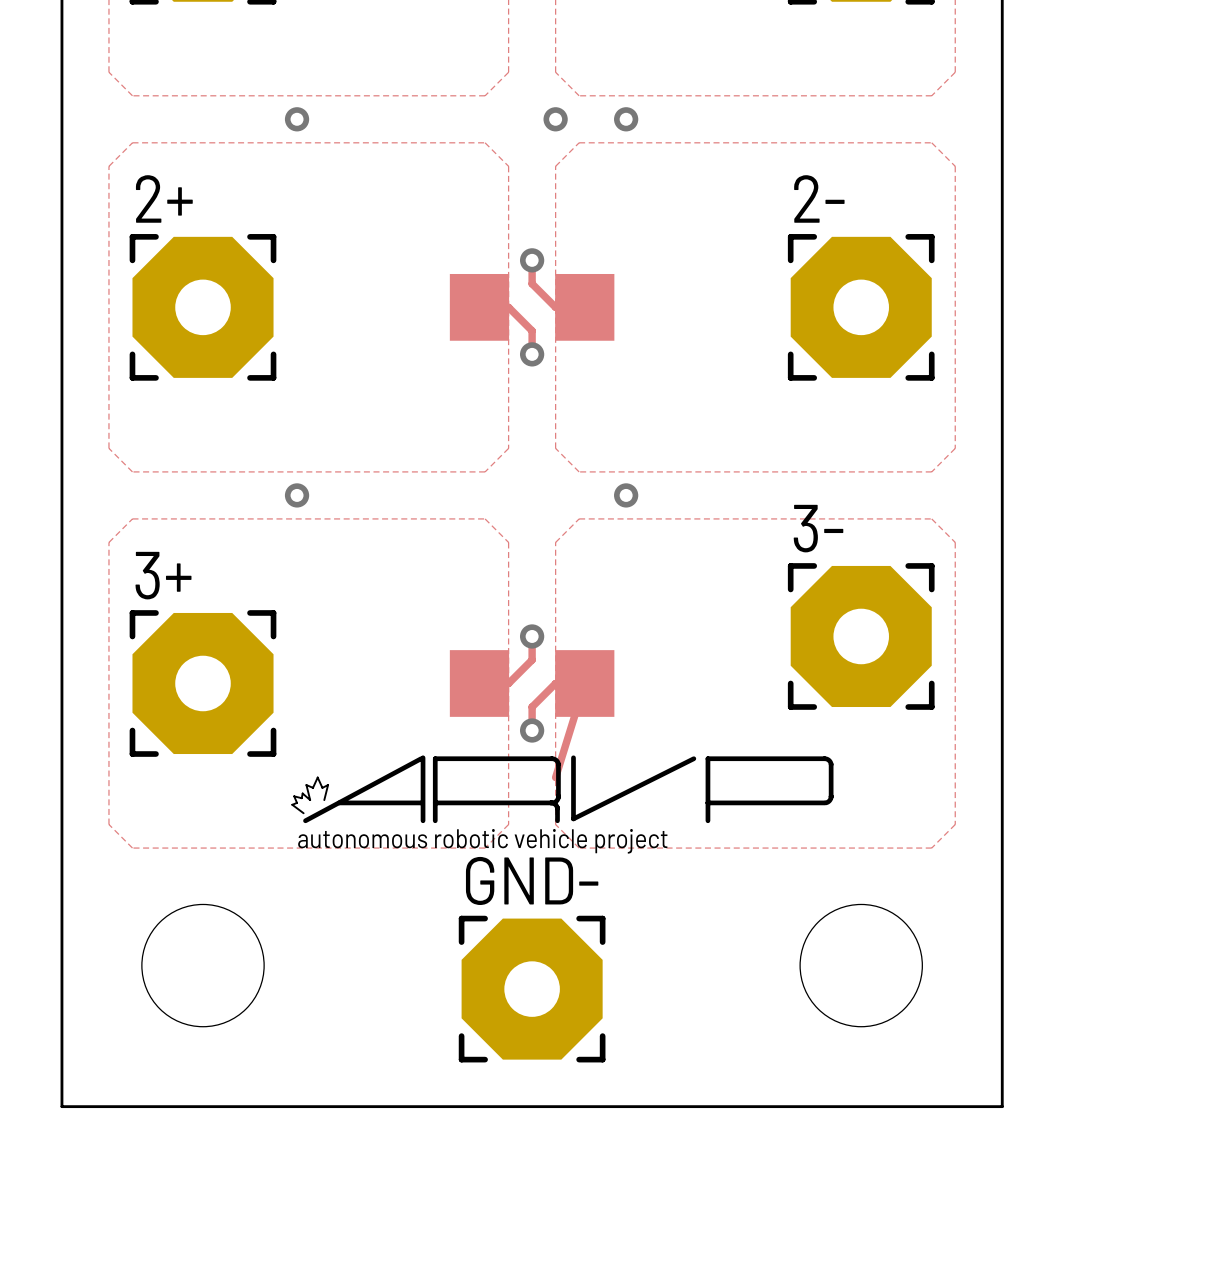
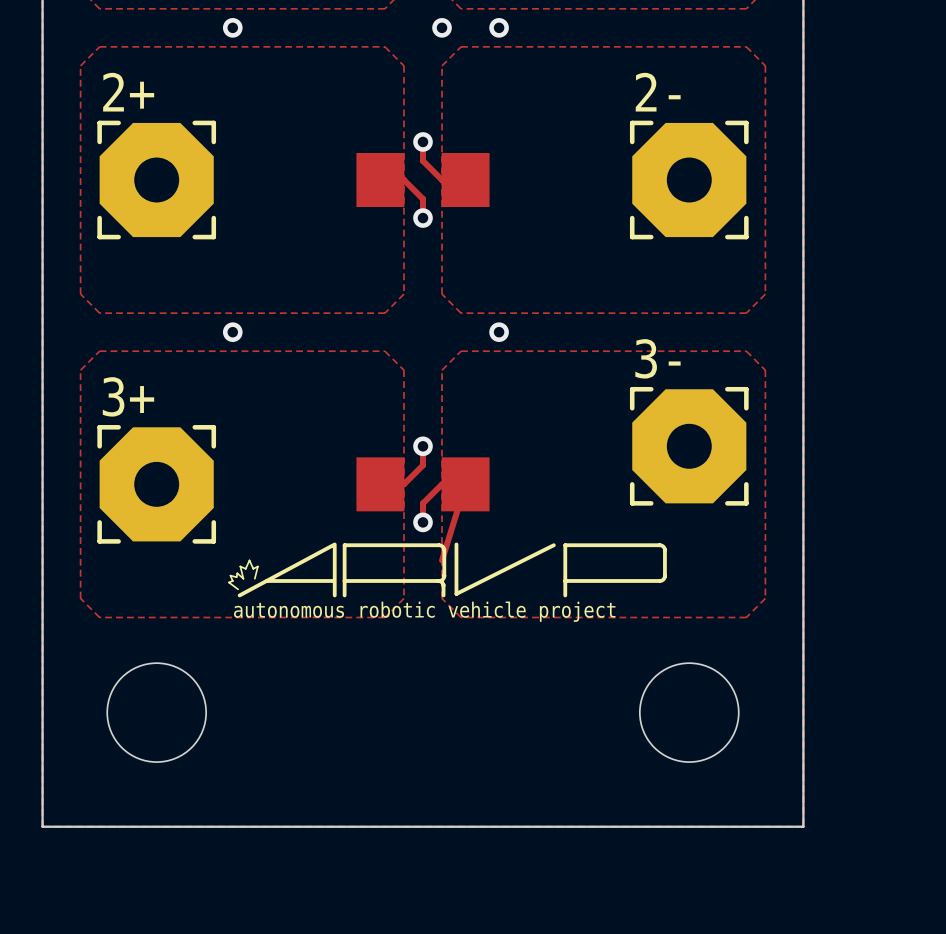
GND-: (532, 989) -> none

